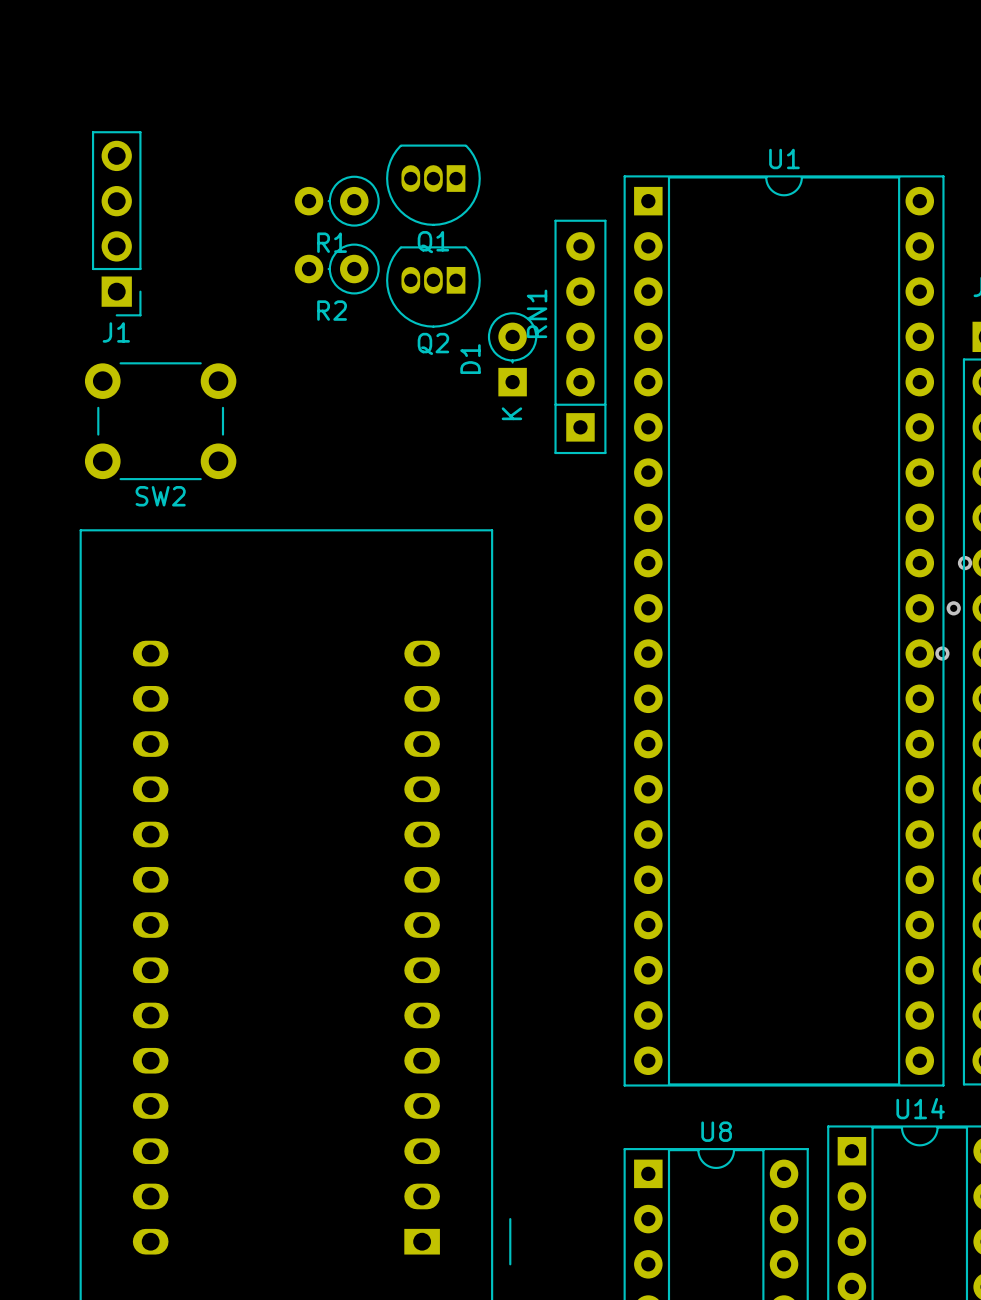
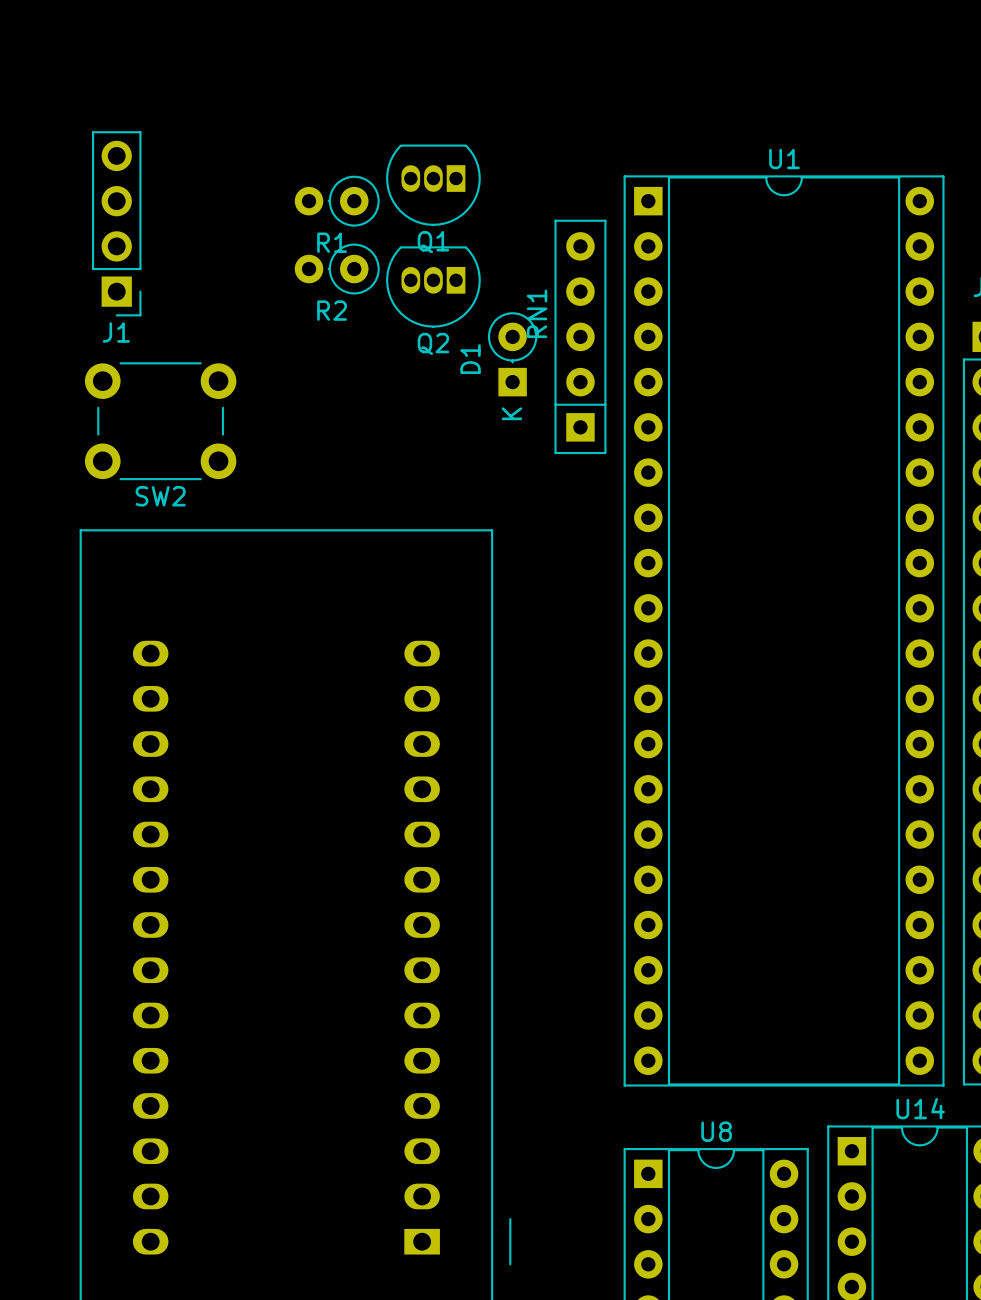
via: (965, 563) -> none
via: (953, 608) -> none
via: (942, 653) -> none

